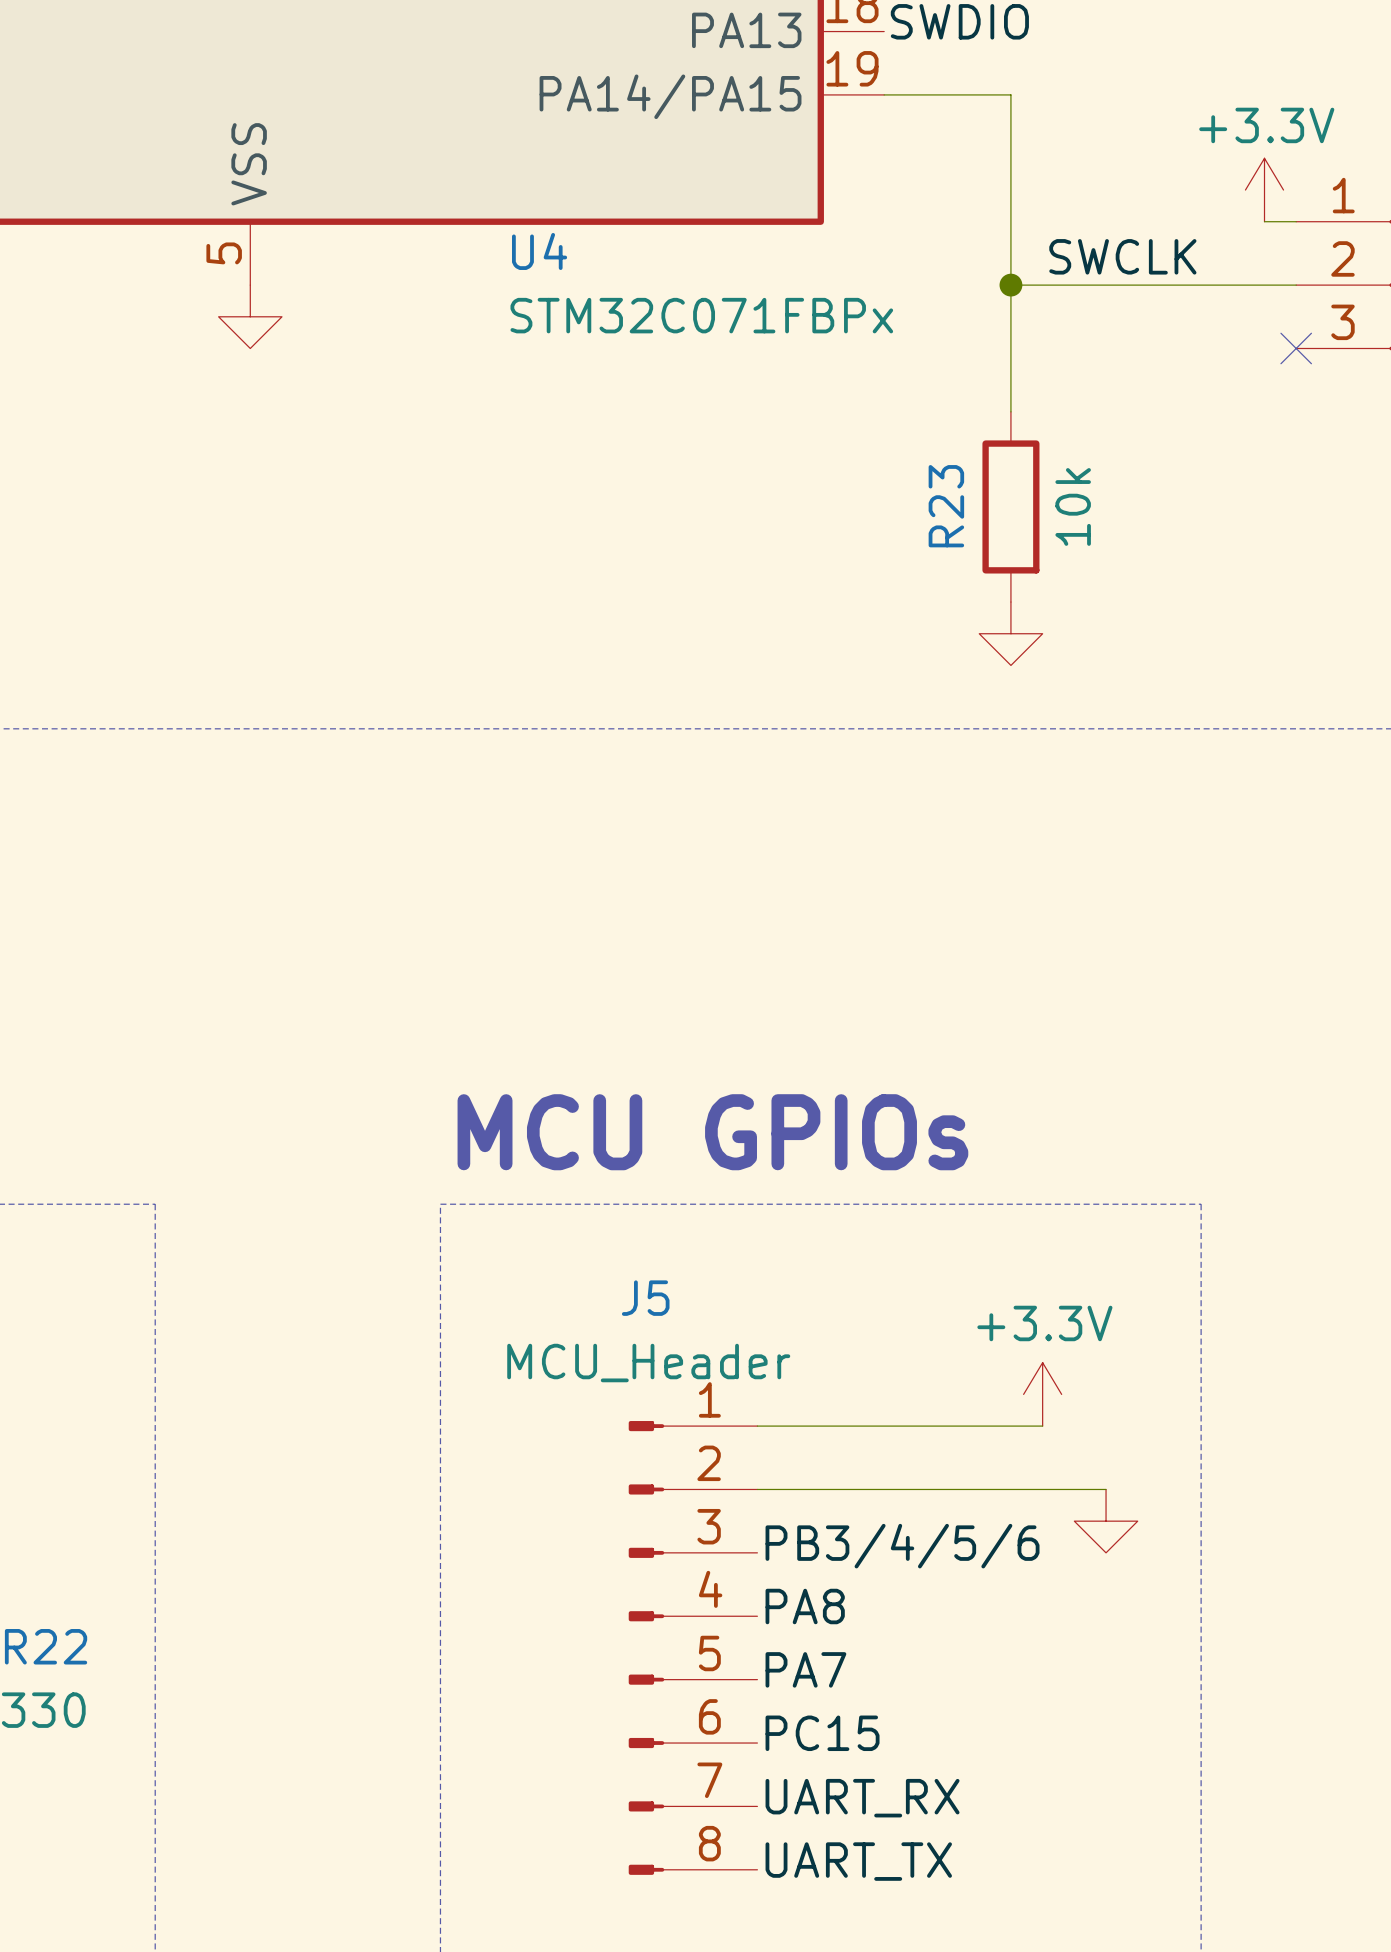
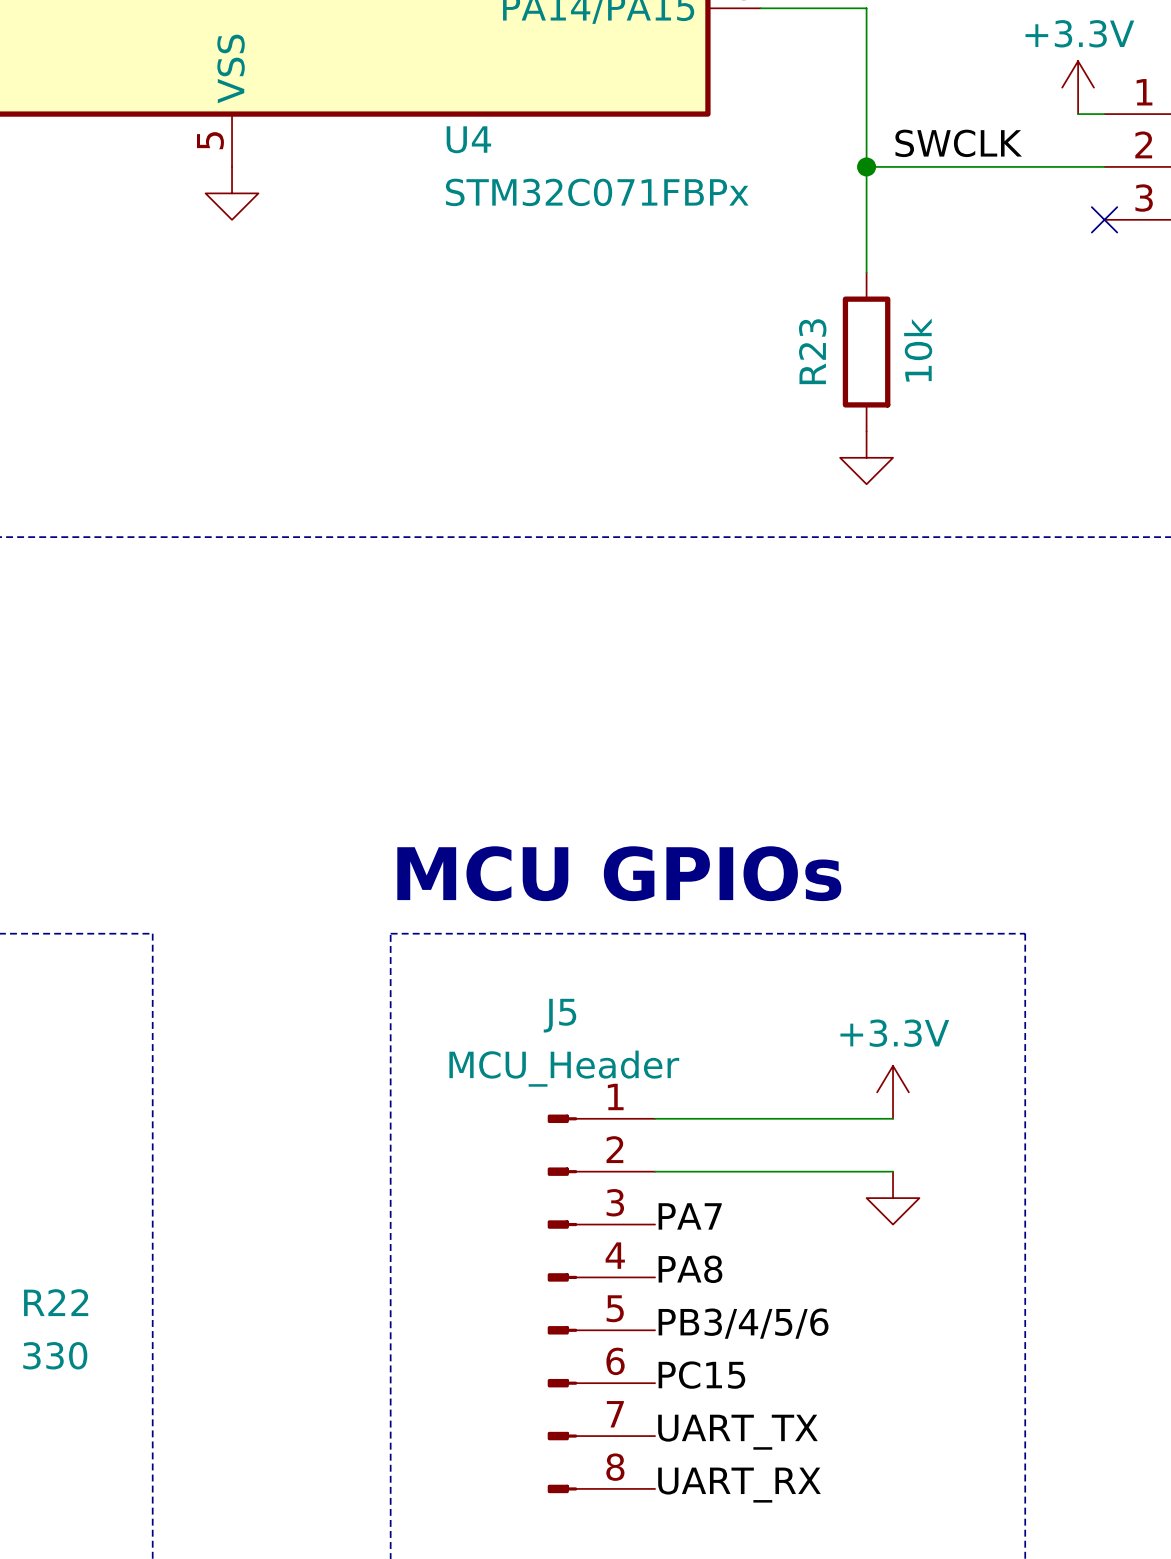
wire: (1042, 1489) (1106, 1489) -> none
power symbol position: (1106, 1521) -> (893, 1198)
label: PB3/4/5/6 (902, 1546) -> PA7 (690, 1216)
label: PA7 (805, 1669) -> PB3/4/5/6 (743, 1323)
label: UART_RX (862, 1798) -> UART_TX (737, 1432)
label: UART_TX (858, 1861) -> UART_RX (739, 1485)

